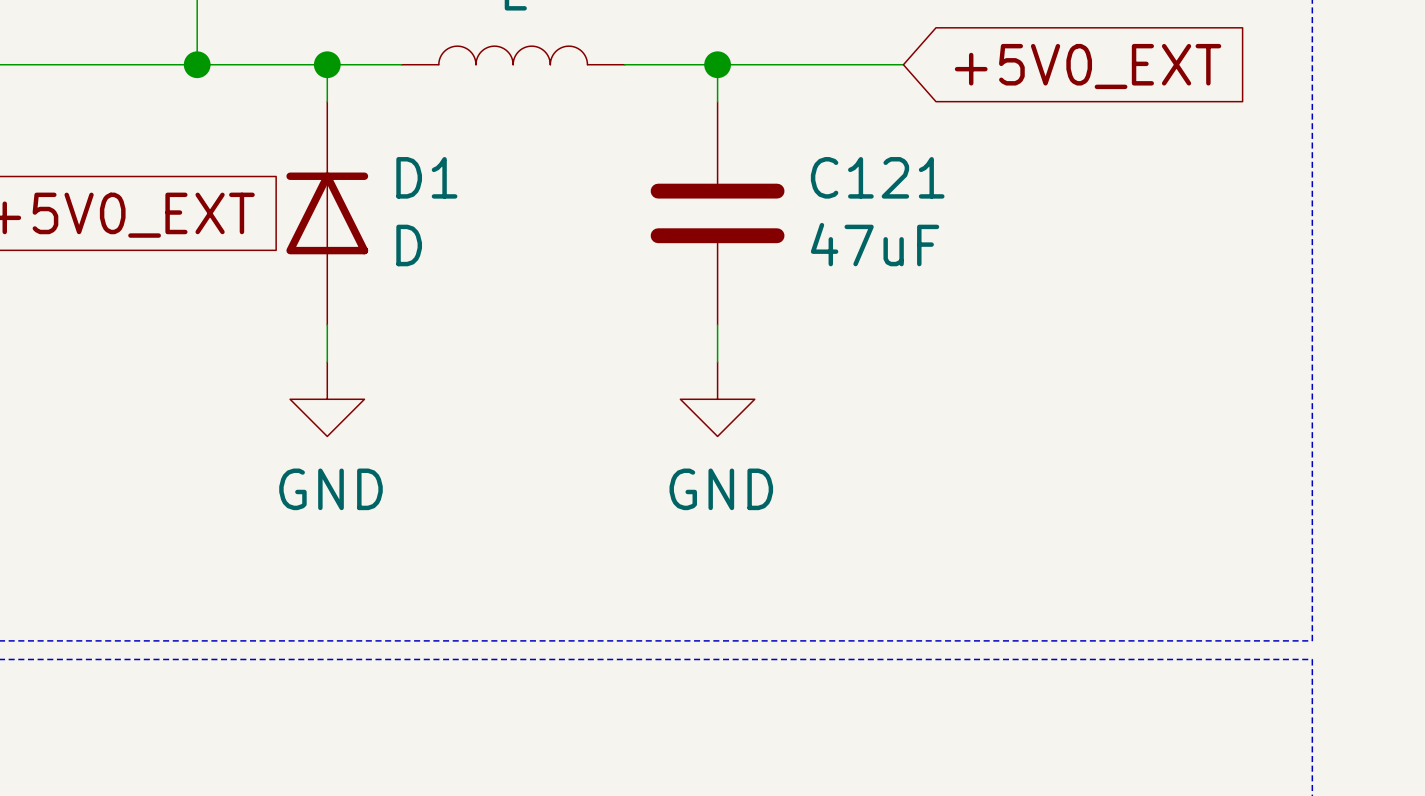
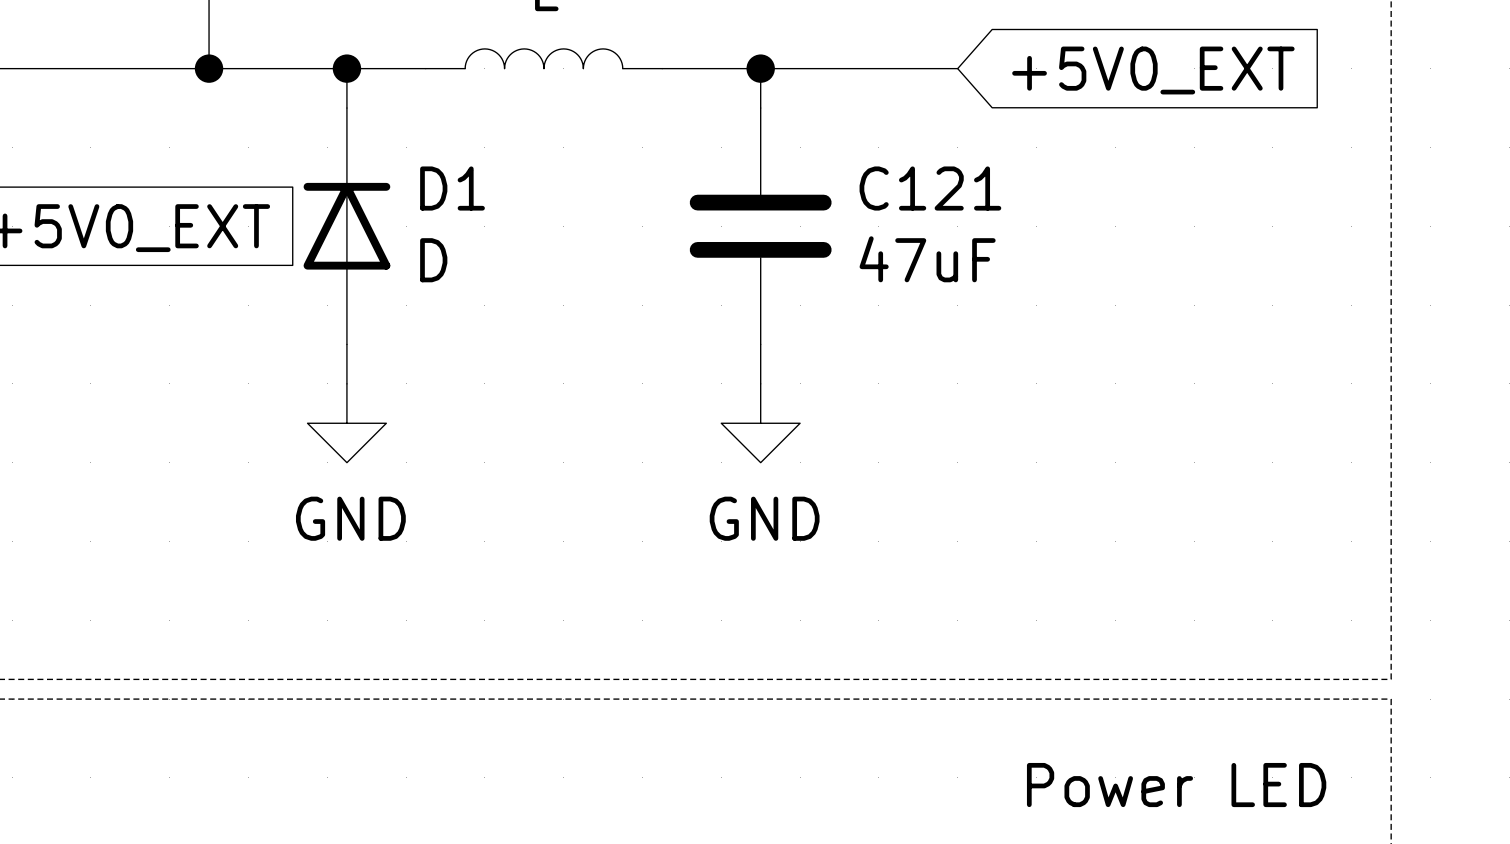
text: none -> Power LED (1176, 785)

